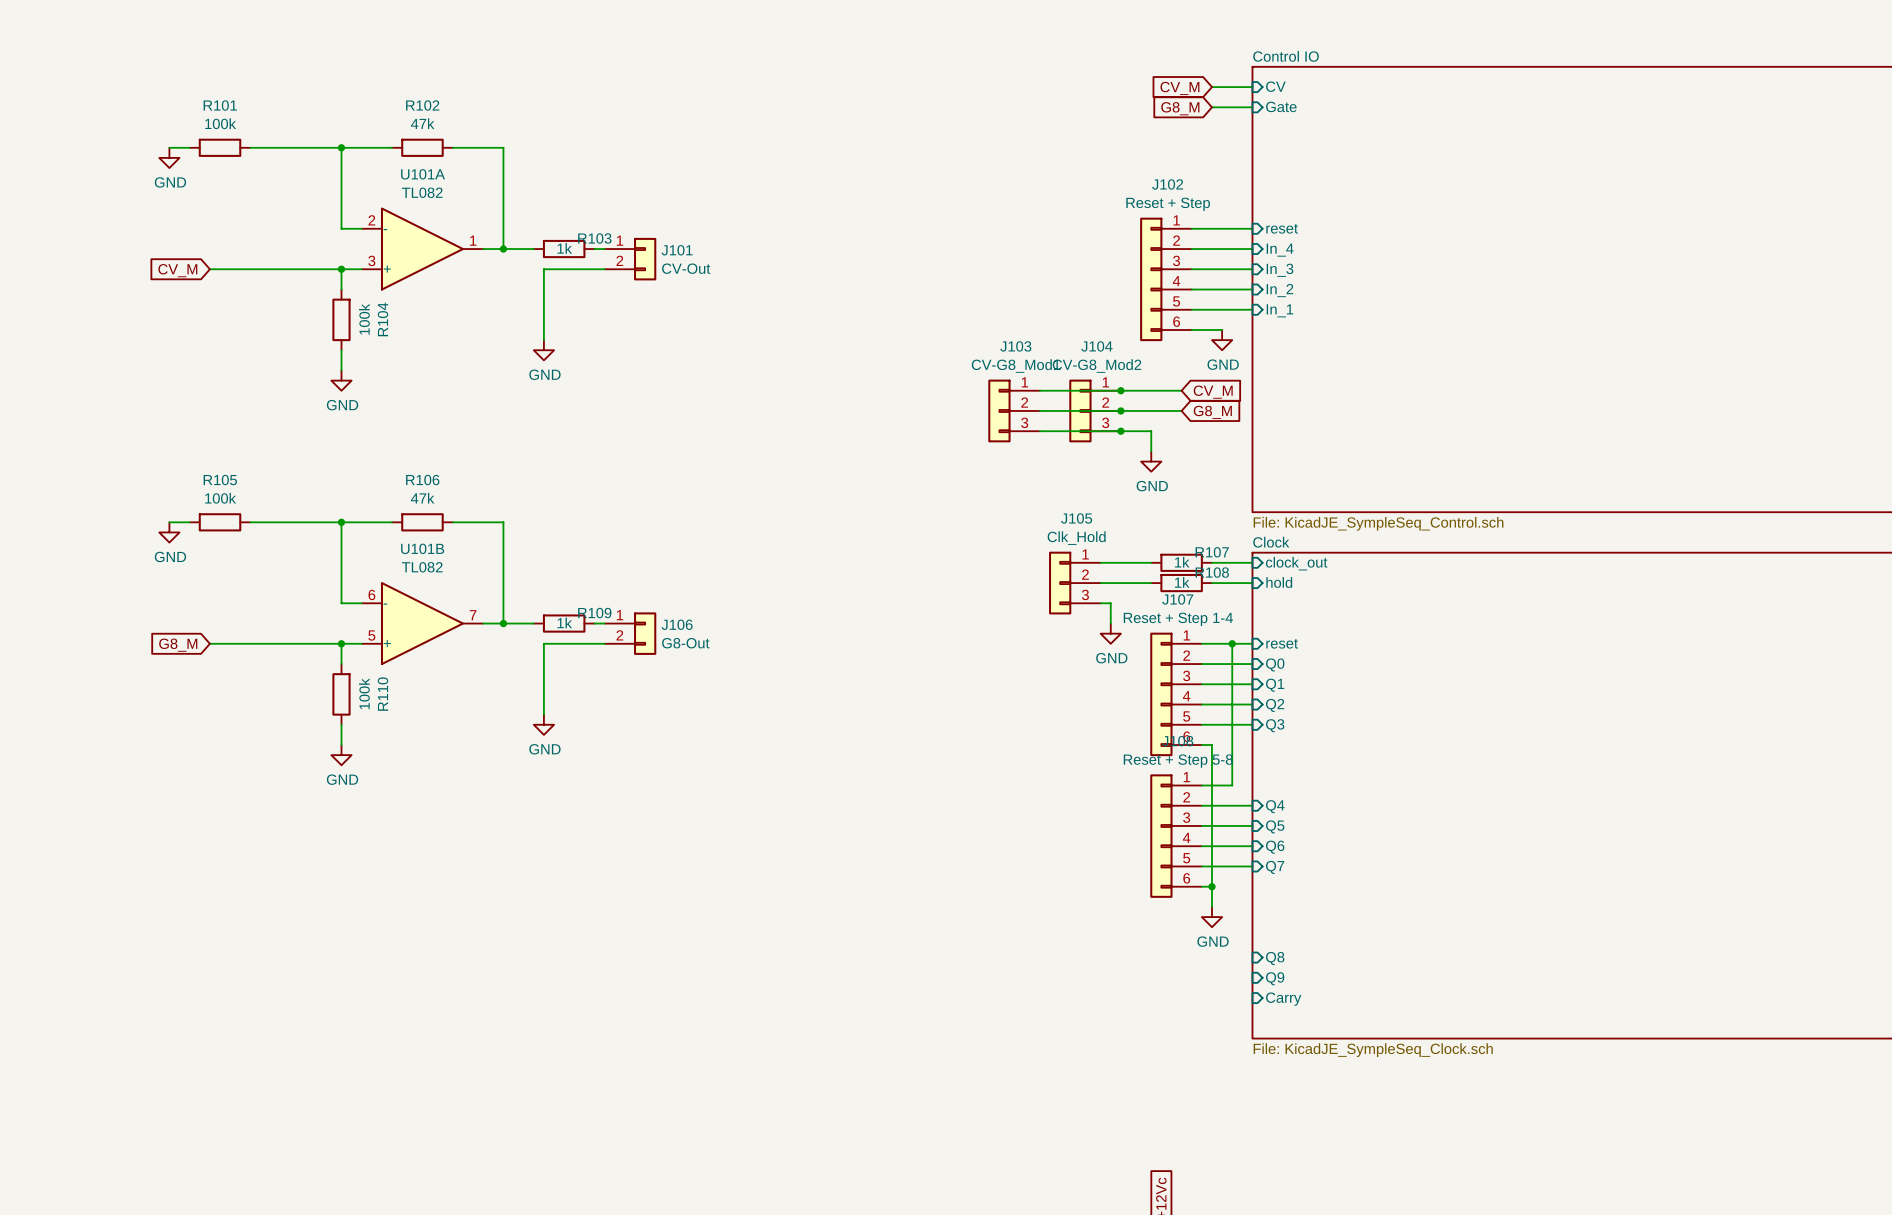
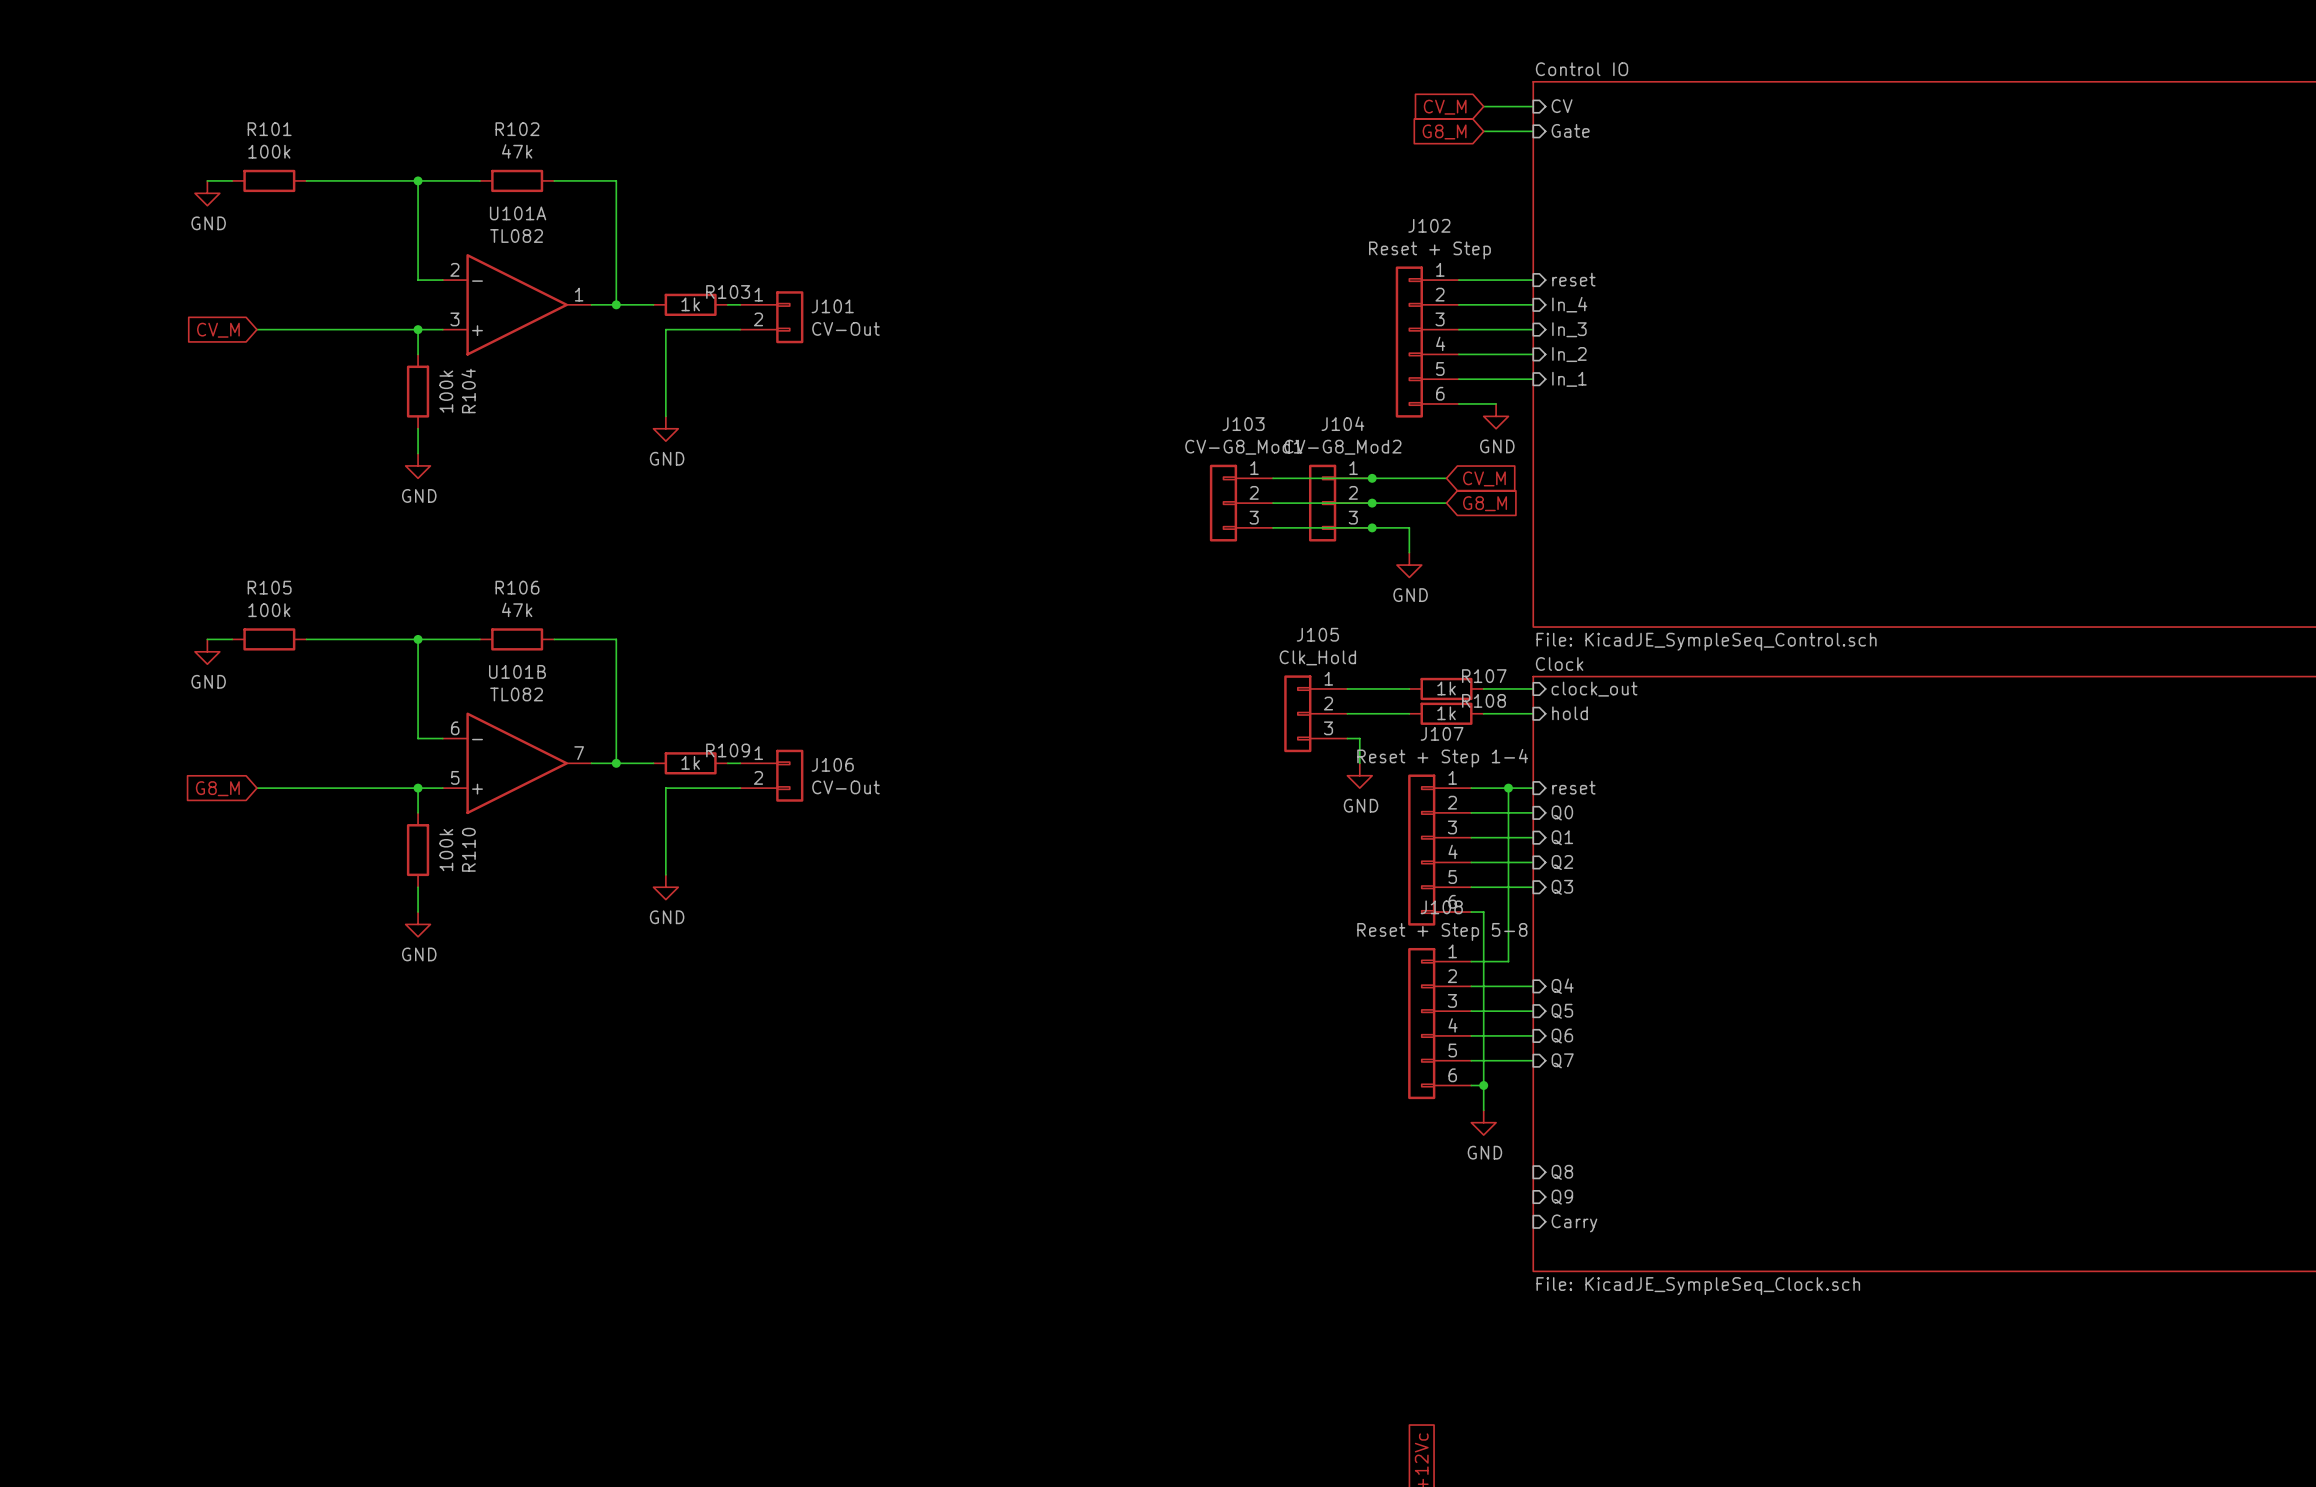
J106 value: G8-Out (685, 643) -> CV-Out (845, 787)

